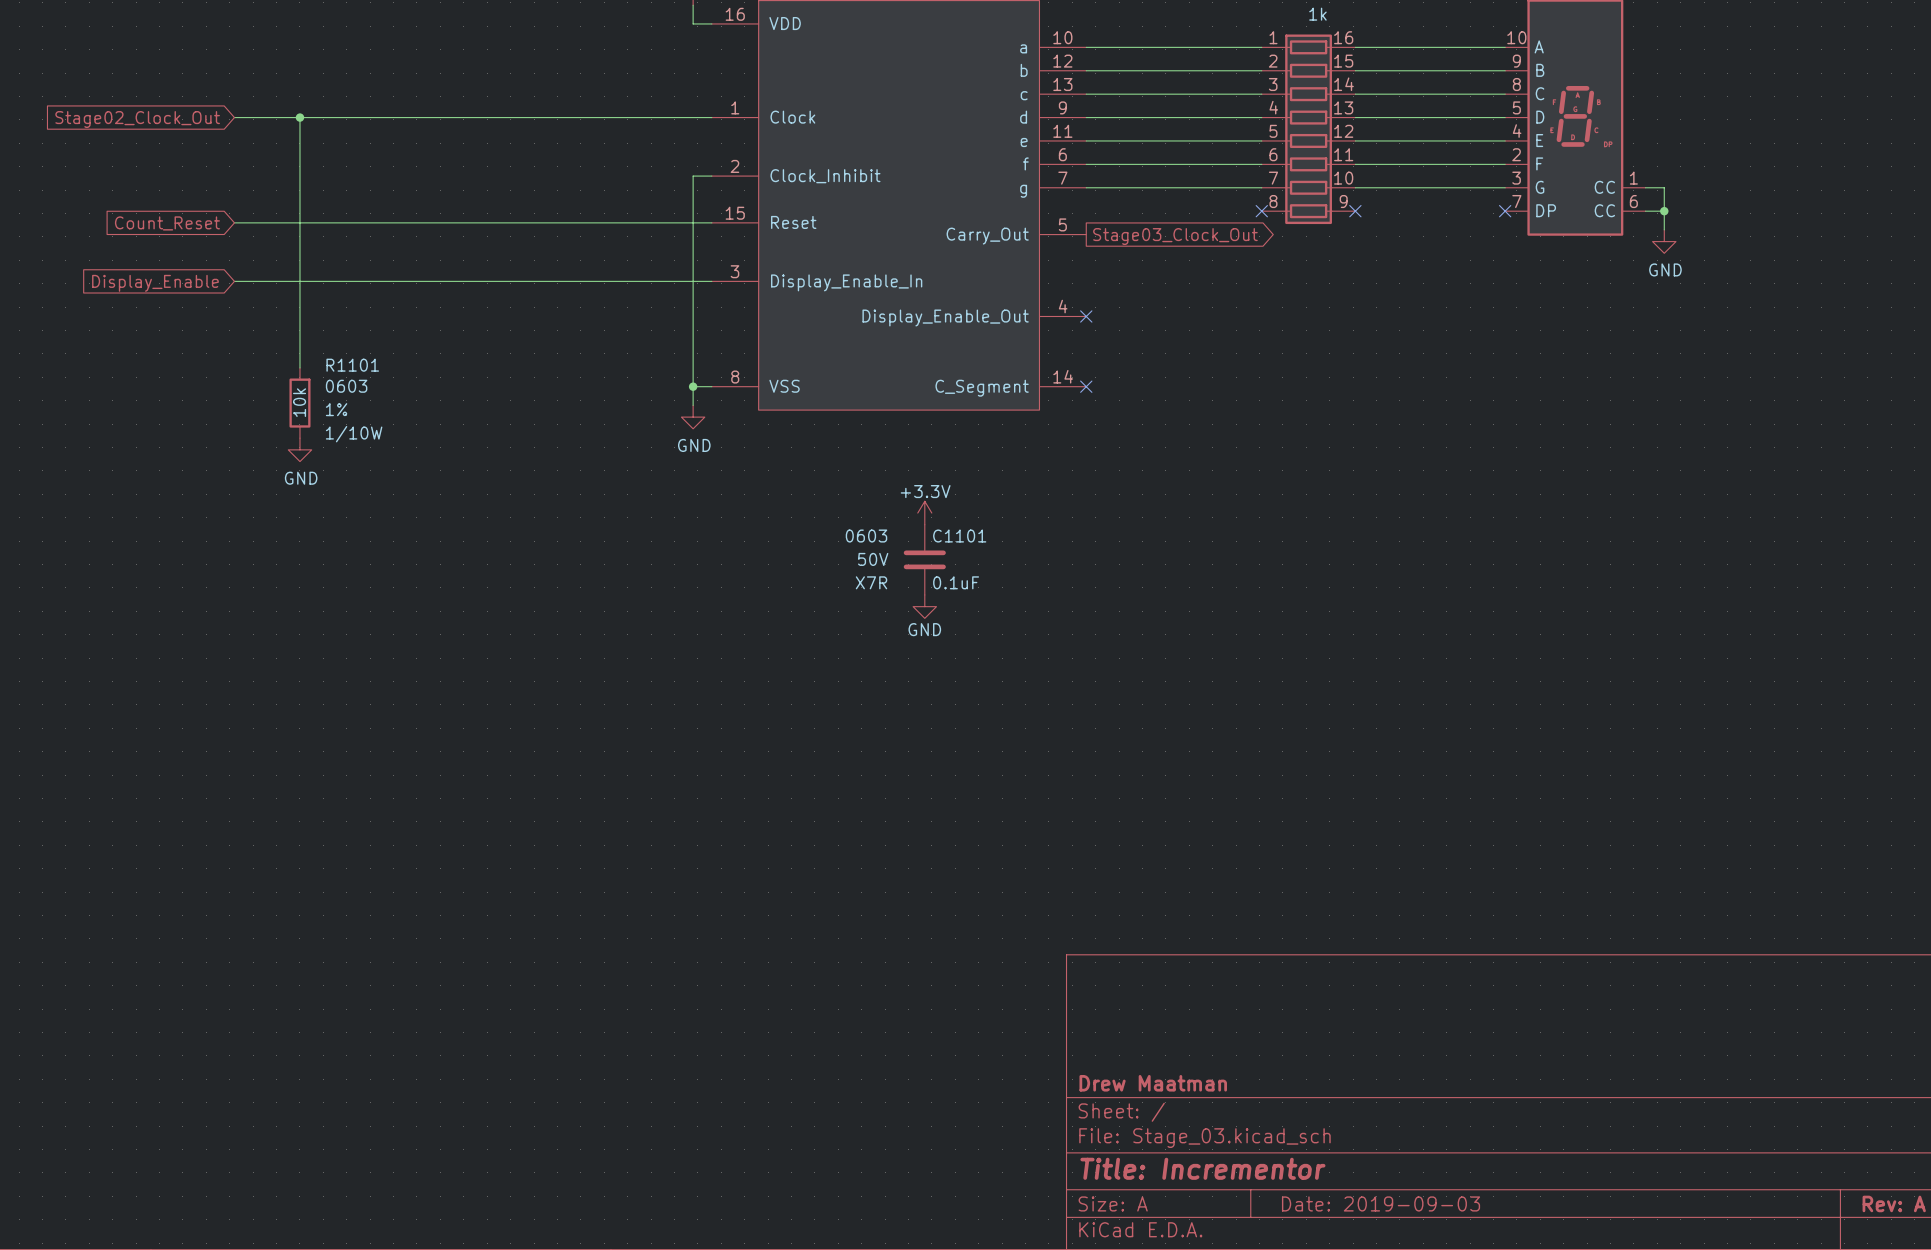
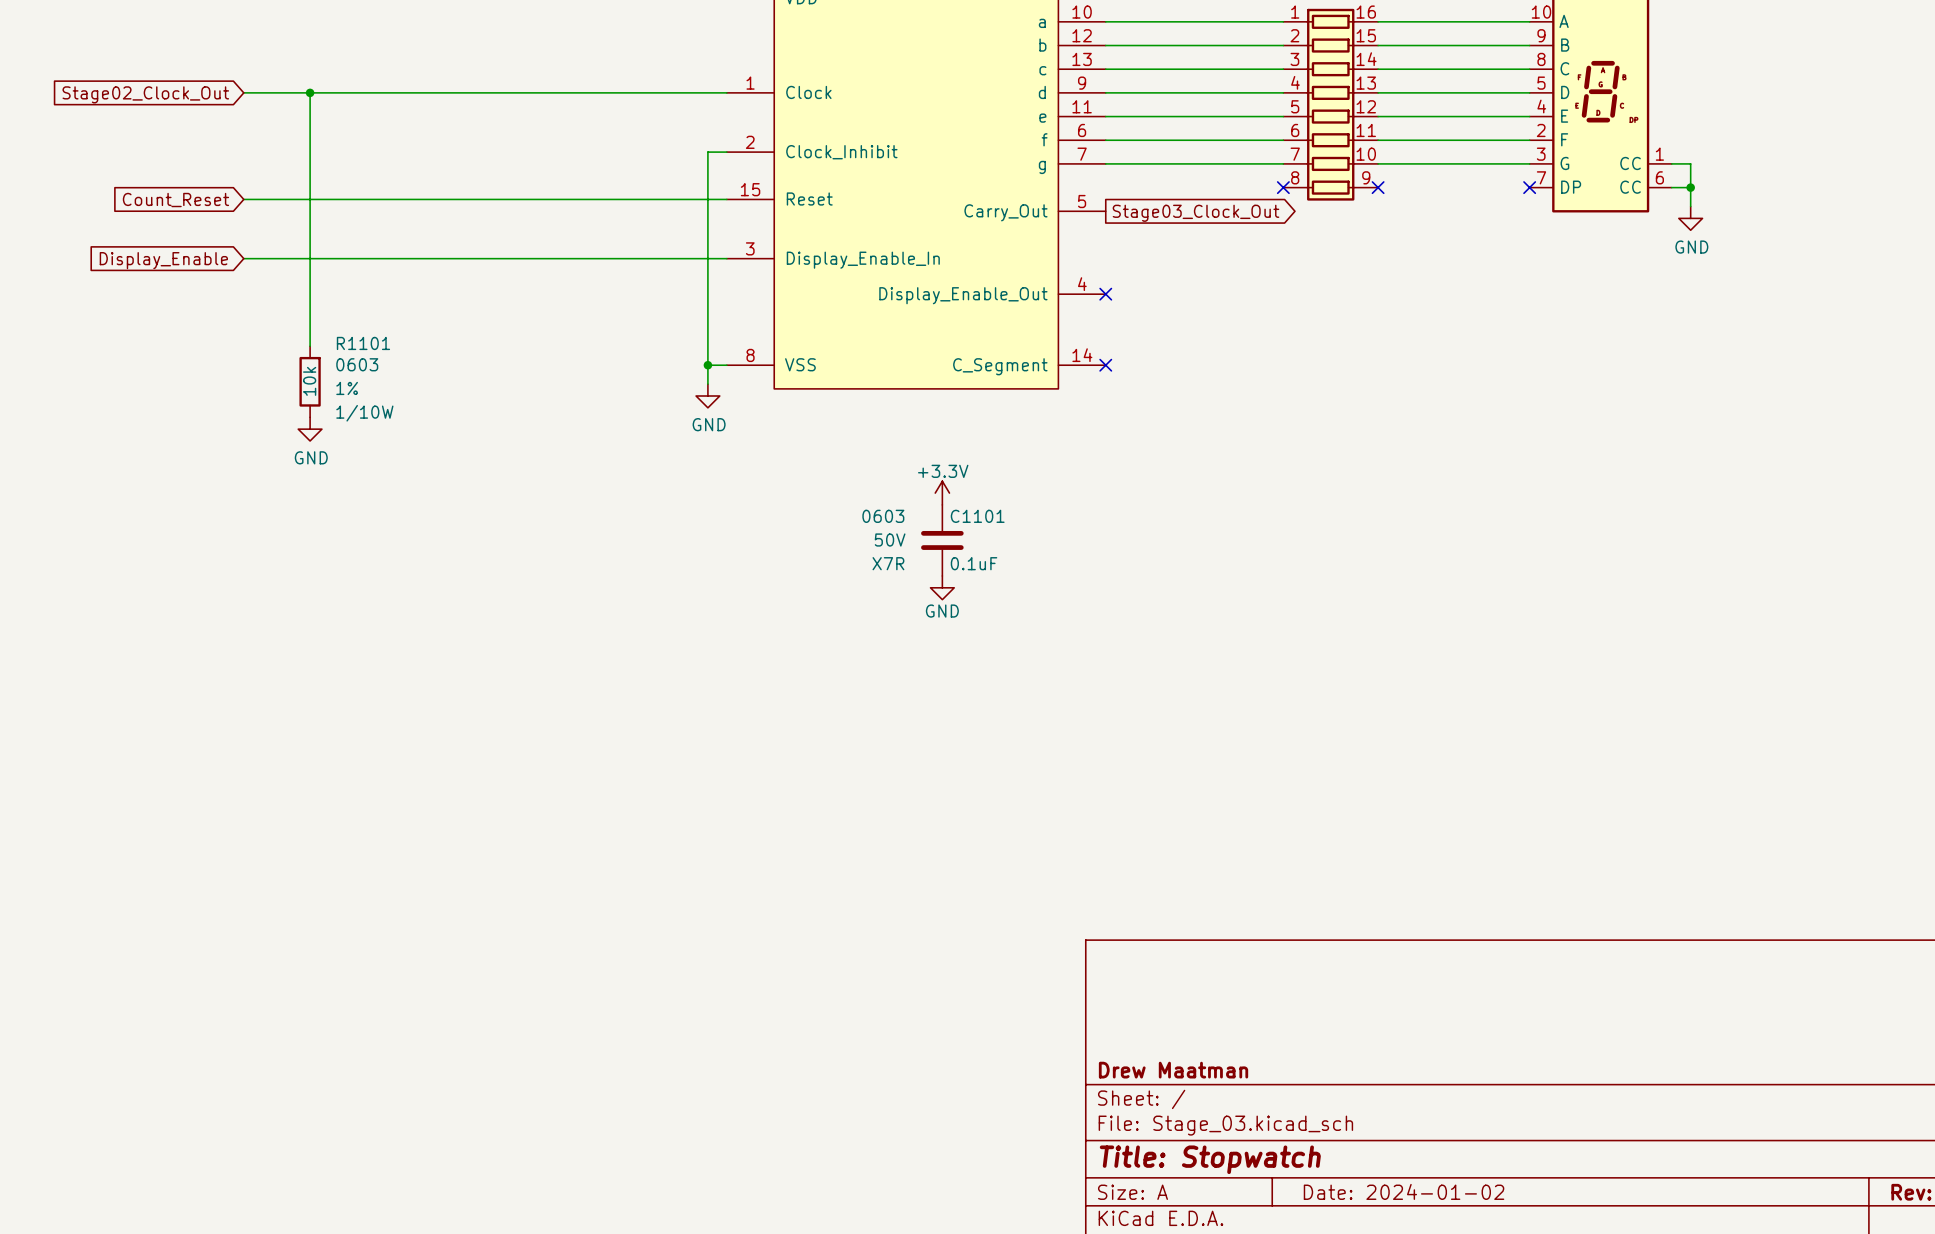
title block: Title: Incrementor (1202, 1168) -> Title: Stopwatch (1210, 1159)
title block: Date: 2019-09-03 (1381, 1203) -> Date: 2024-01-02 (1404, 1191)

